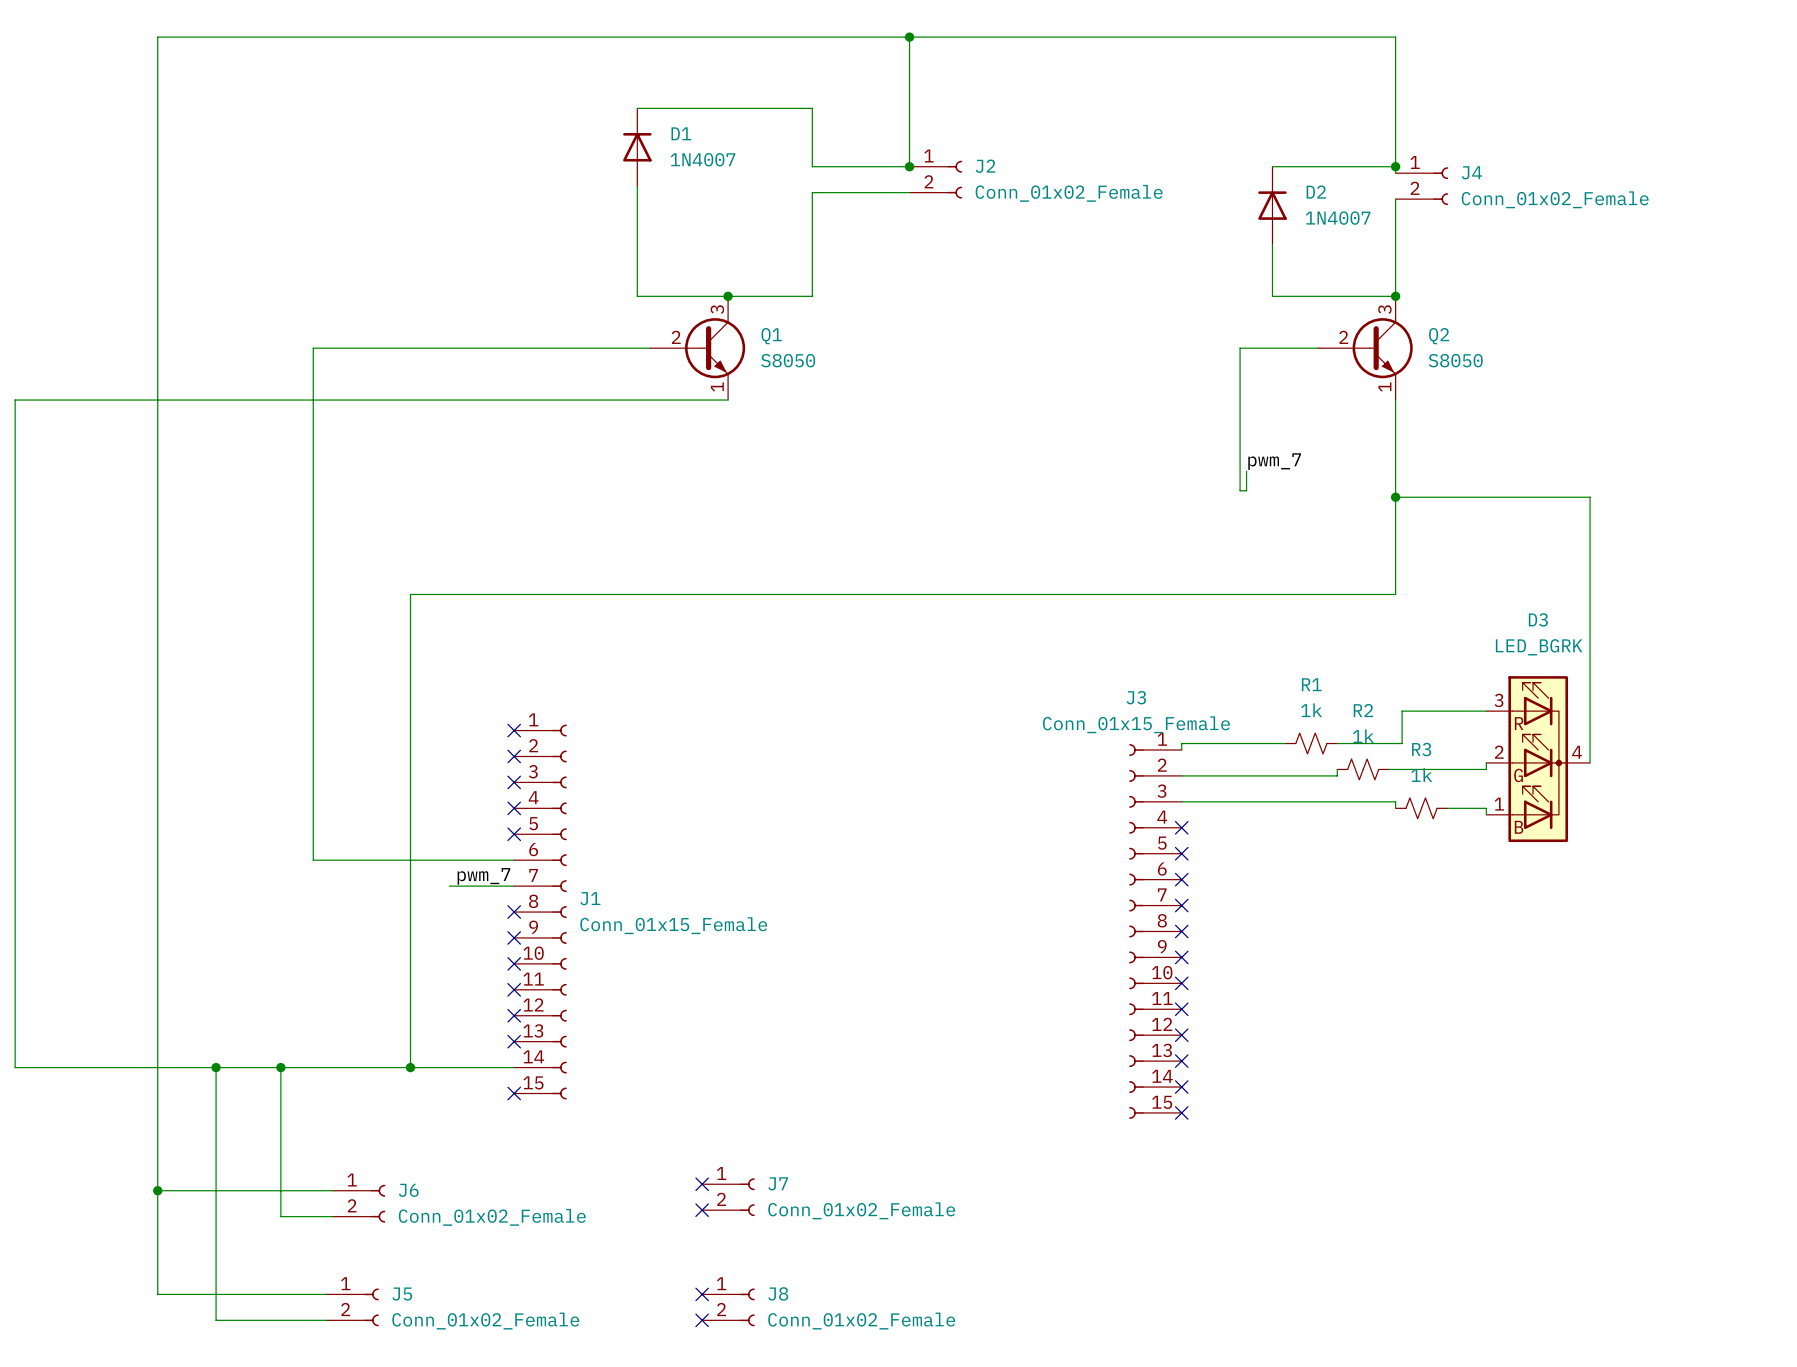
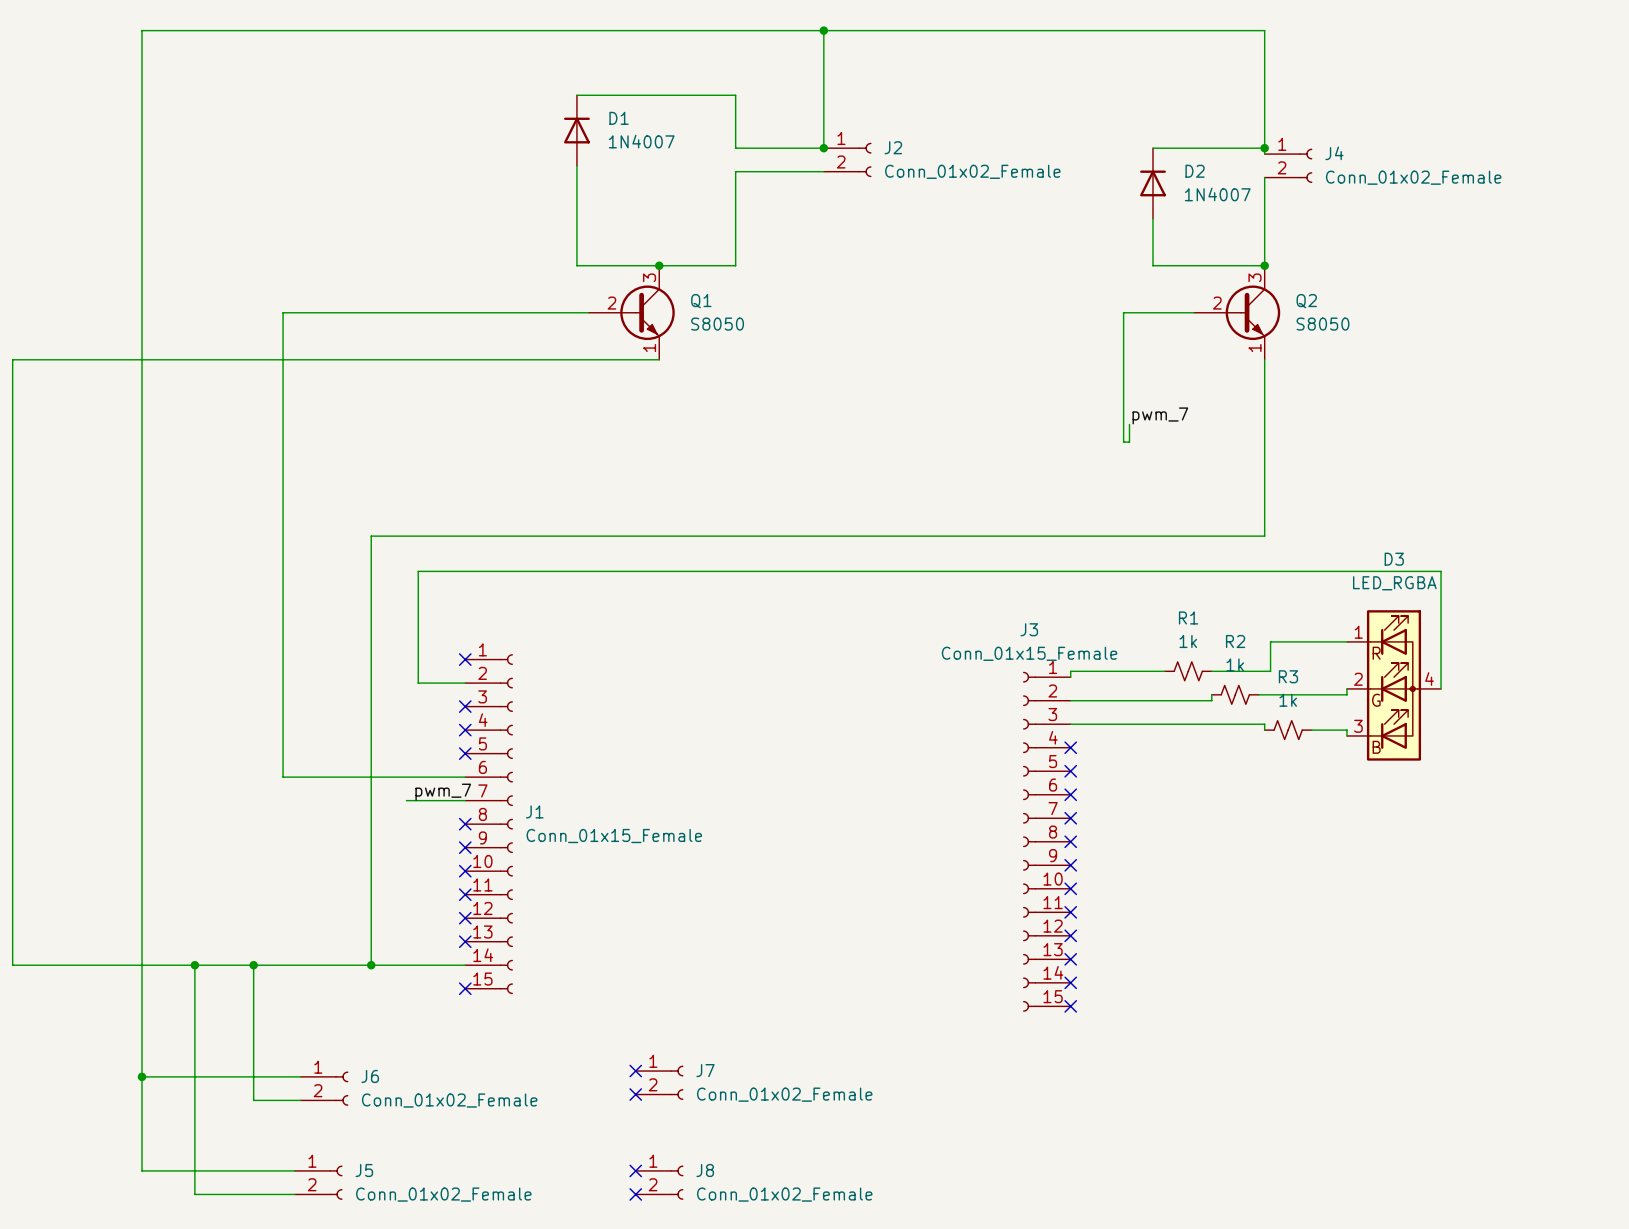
wire: (1395, 497) (1590, 497) (1590, 633) -> (465, 683) (418, 683) (418, 571) (1441, 571)
junction: (1395, 497) -> none
D3 value: LED_BGRK (1539, 647) -> LED_RGBA (1394, 583)
D3 symbol: [1486, 676, 1591, 843] -> [1346, 610, 1442, 761]
no-connect mark: (514, 756) -> none

